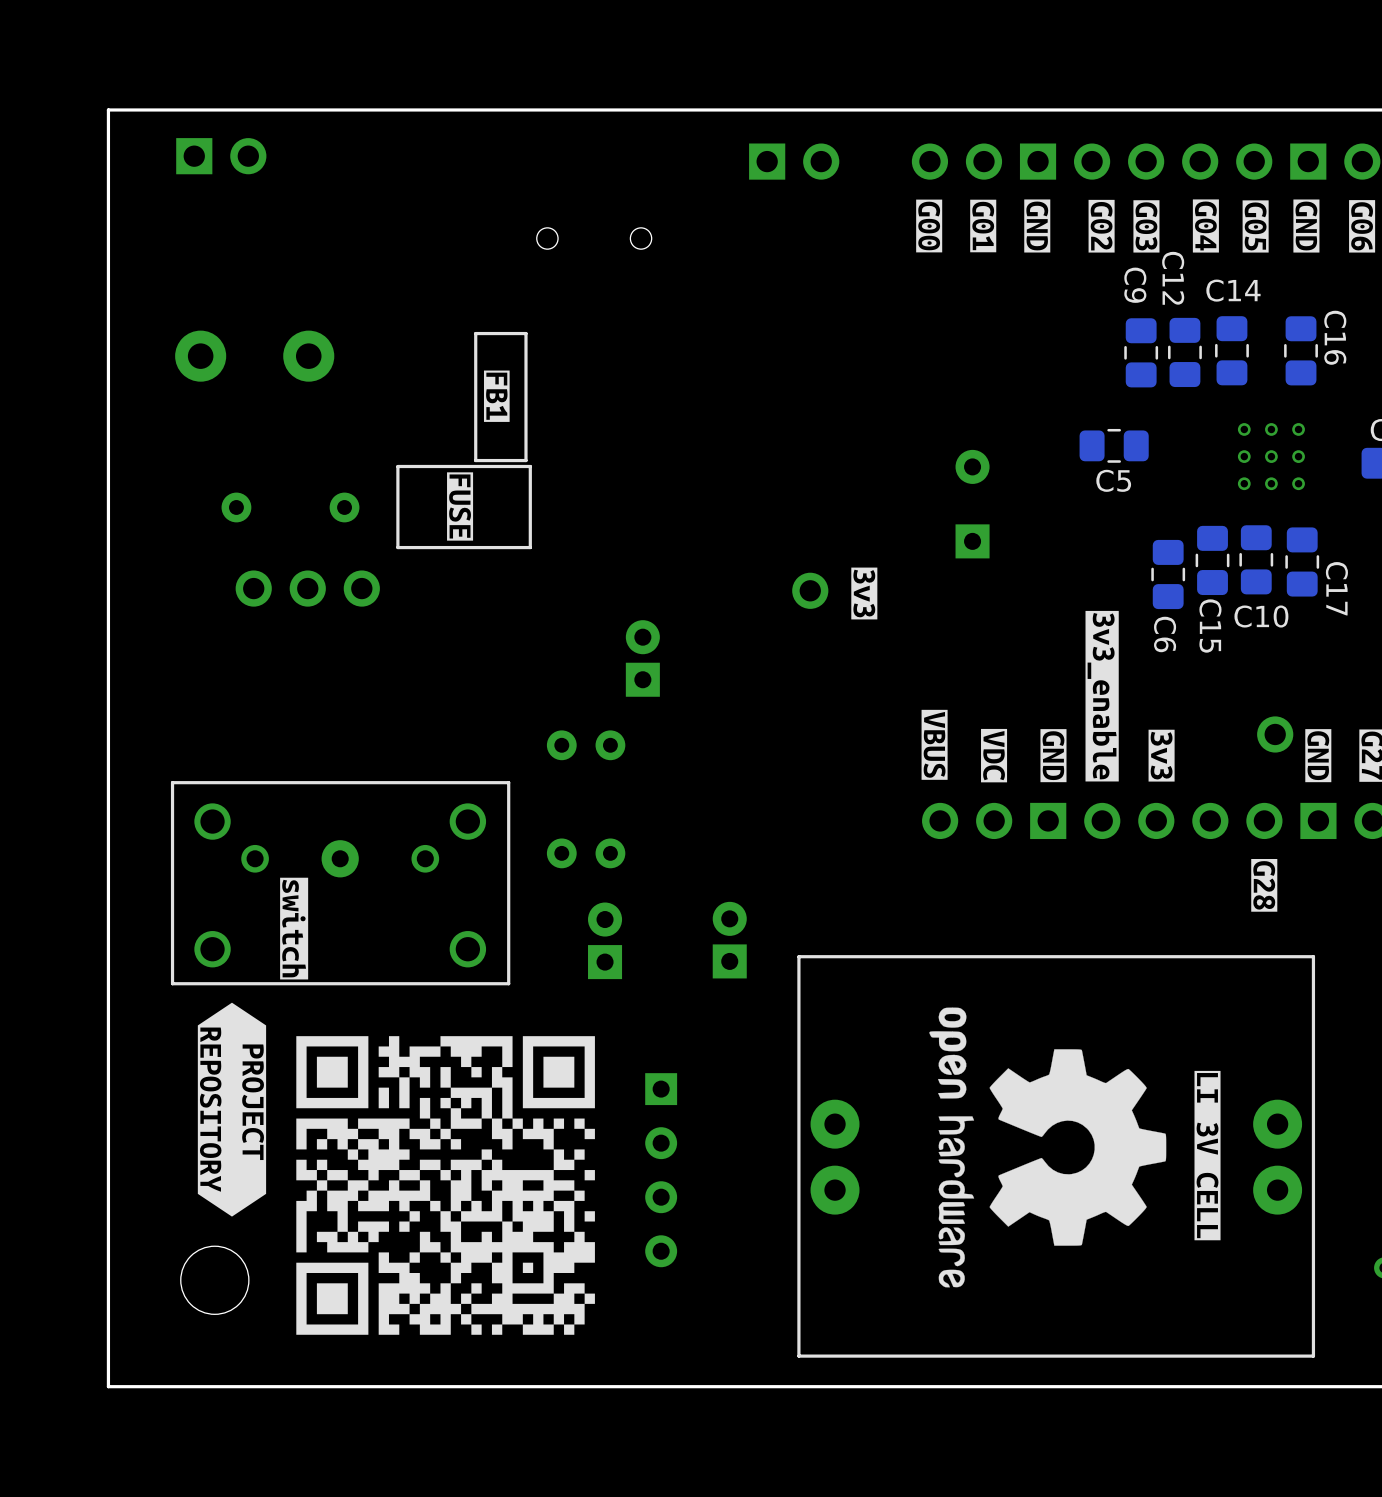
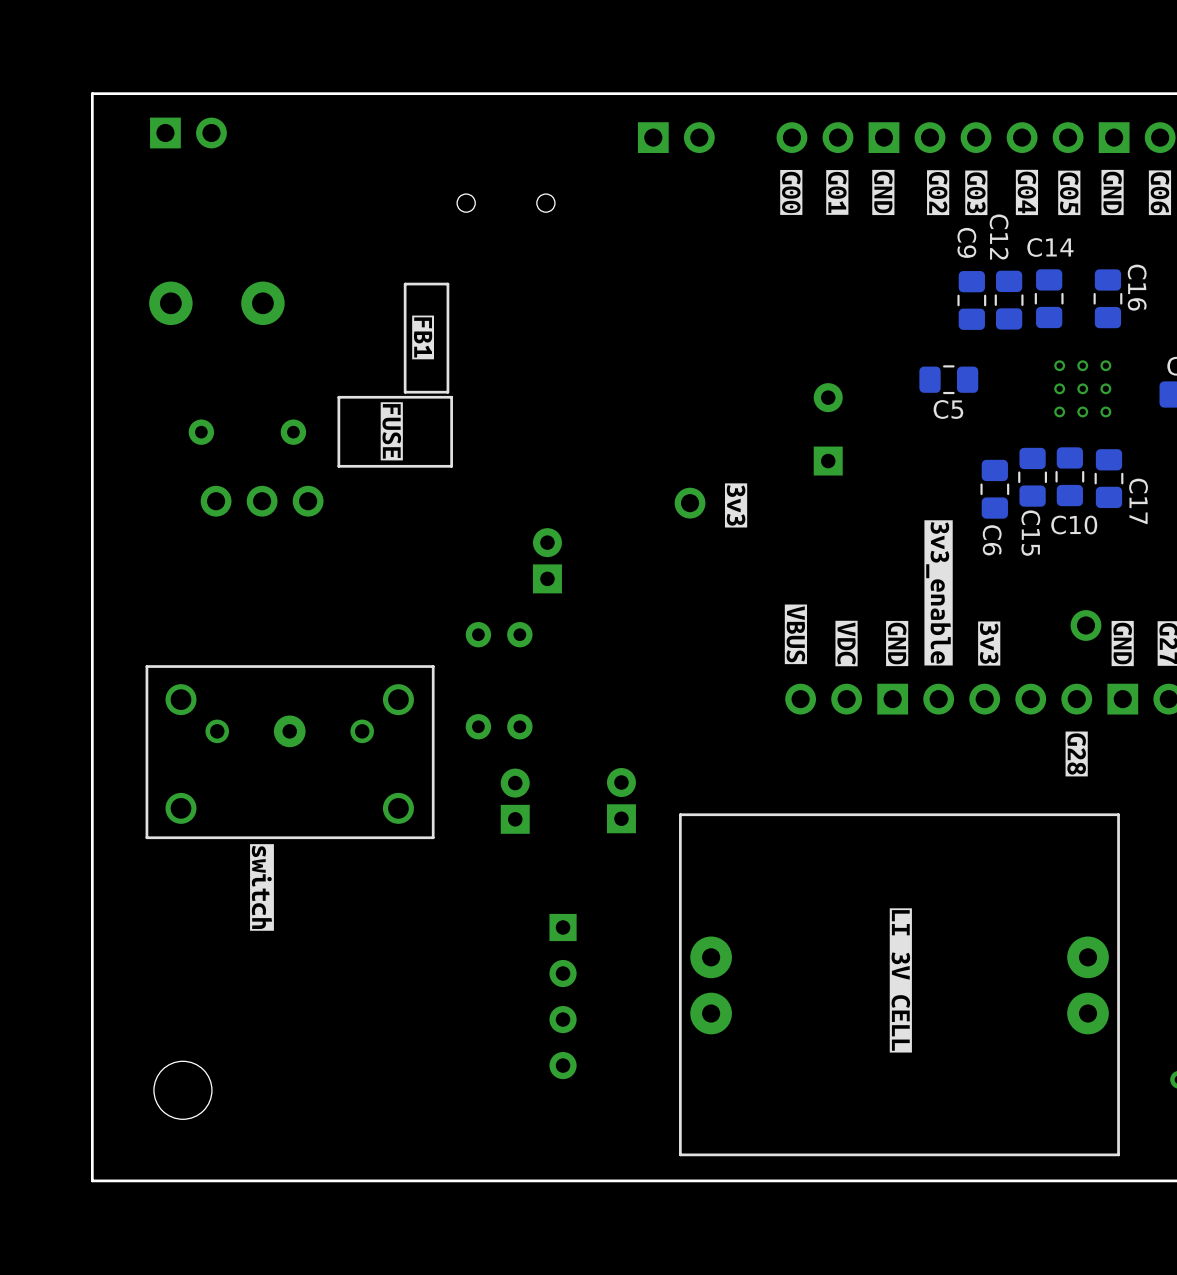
drawing position: (294, 928) -> (261, 887)
drawing: [197, 1002, 267, 1217] -> none
drawing: [929, 1007, 1167, 1288] -> none
drawing: [296, 1036, 595, 1335] -> none
drawing position: (1207, 1155) -> (900, 980)

